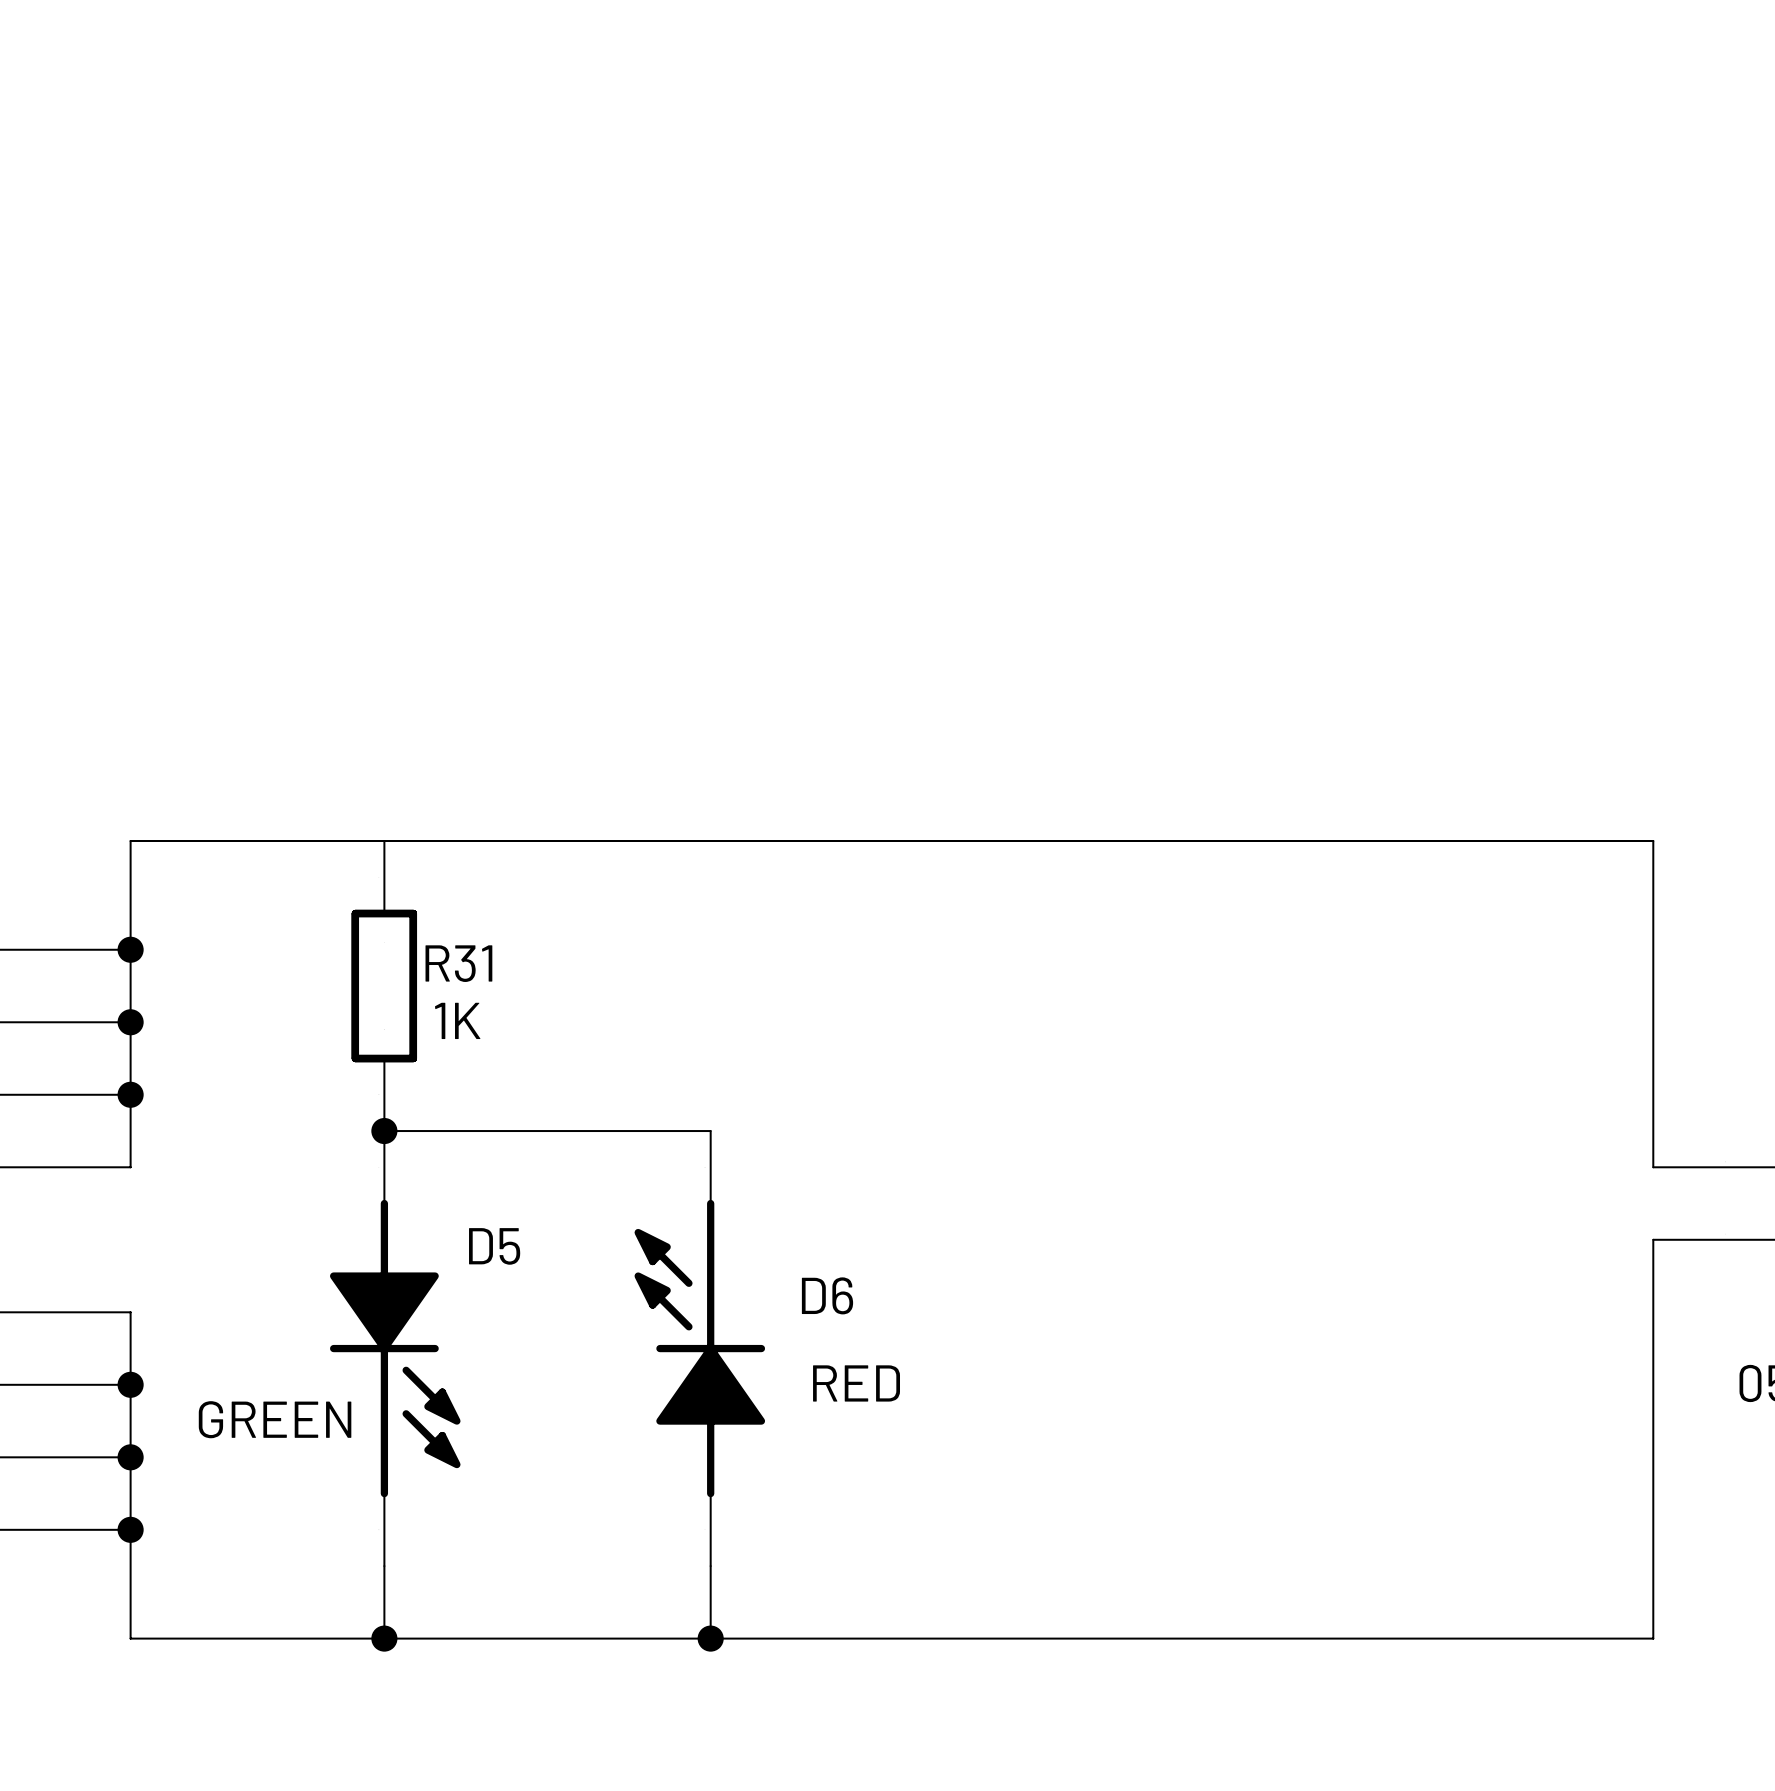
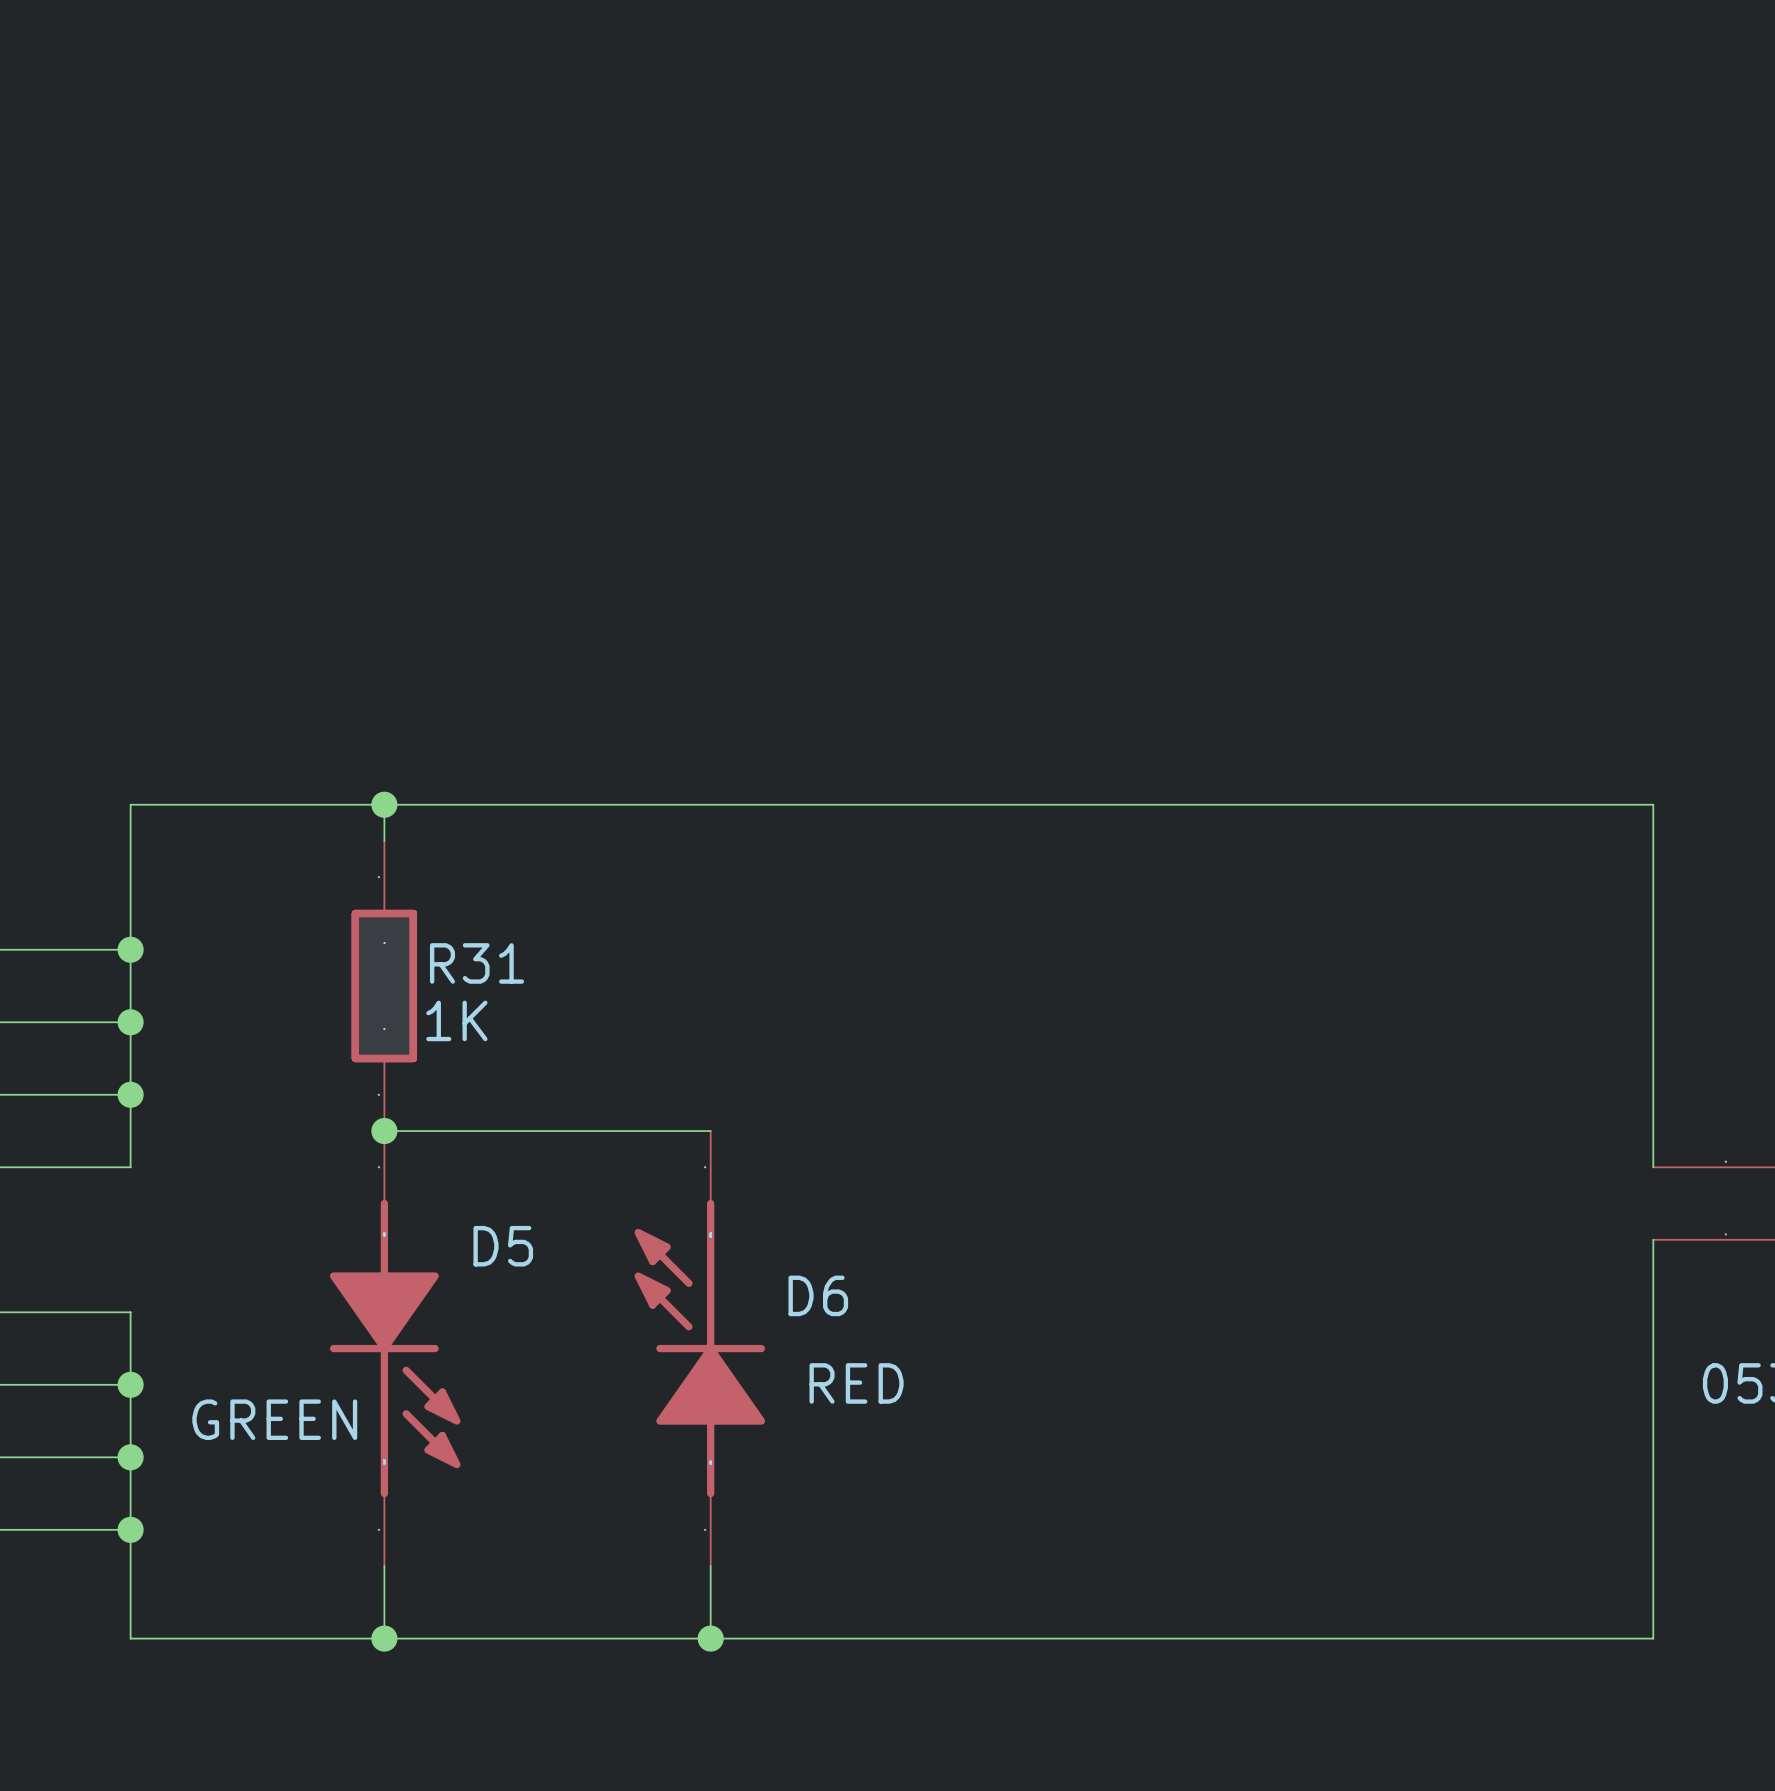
wire: none -> (384, 804) (384, 841)
junction: none -> (384, 804)
wire: (130, 841) (1653, 841) -> (130, 841) (130, 804) (1653, 804) (1653, 841)

